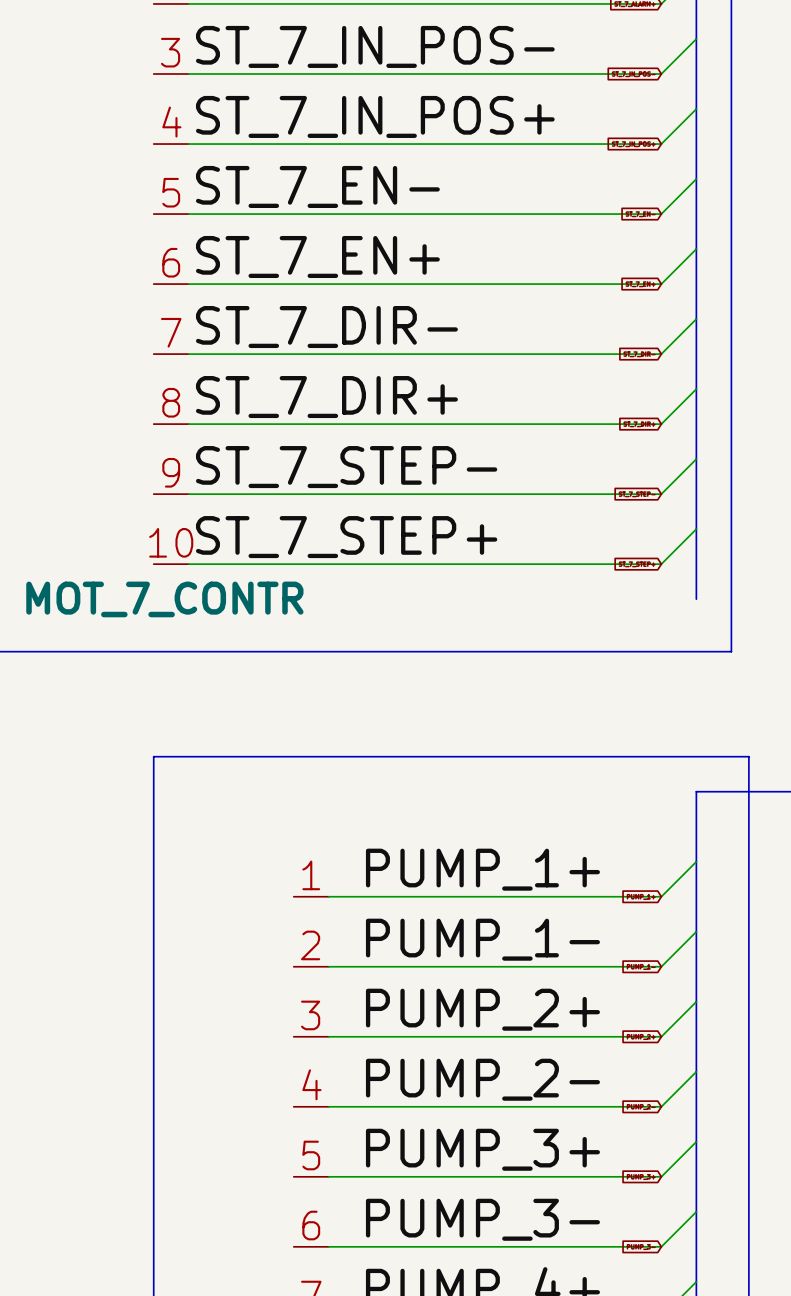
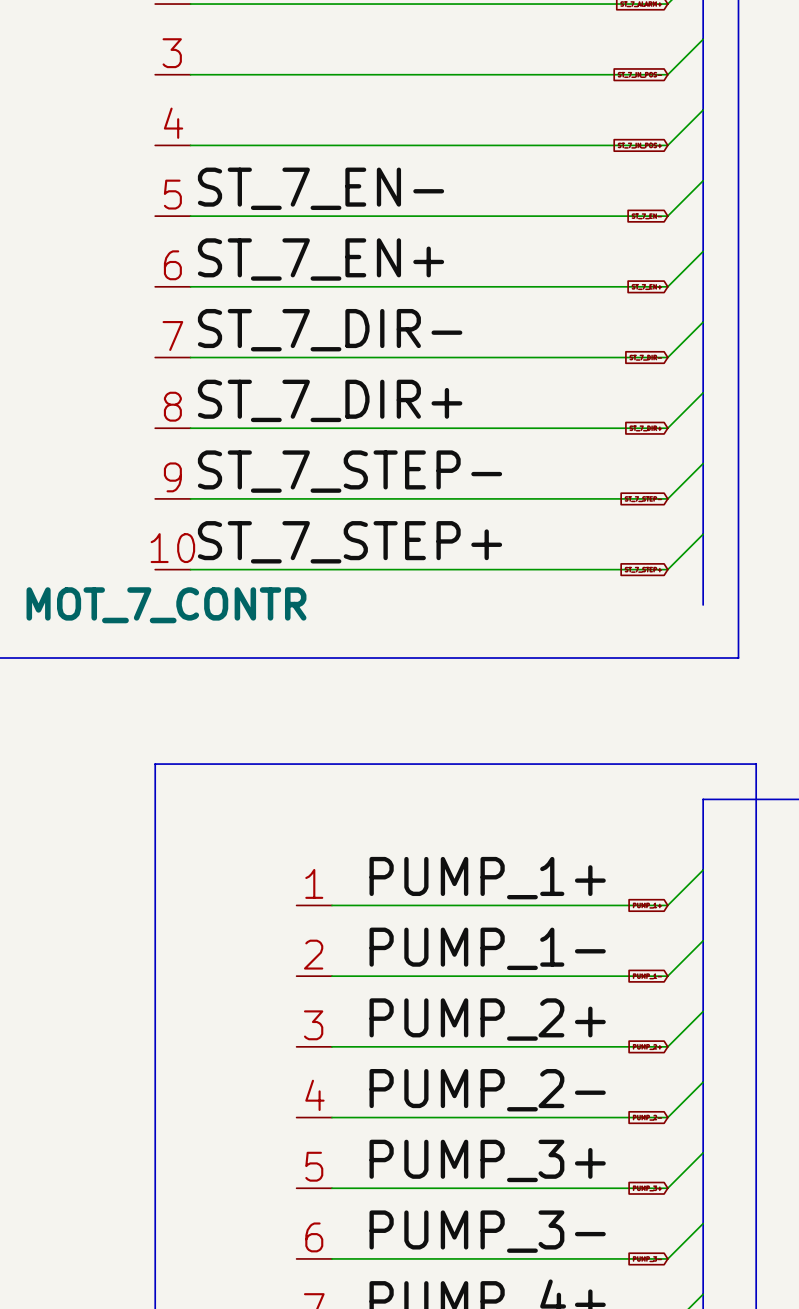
label: ST_7_IN_POS- (375, 46) -> none
label: ST_7_IN_POS+ (375, 116) -> none

